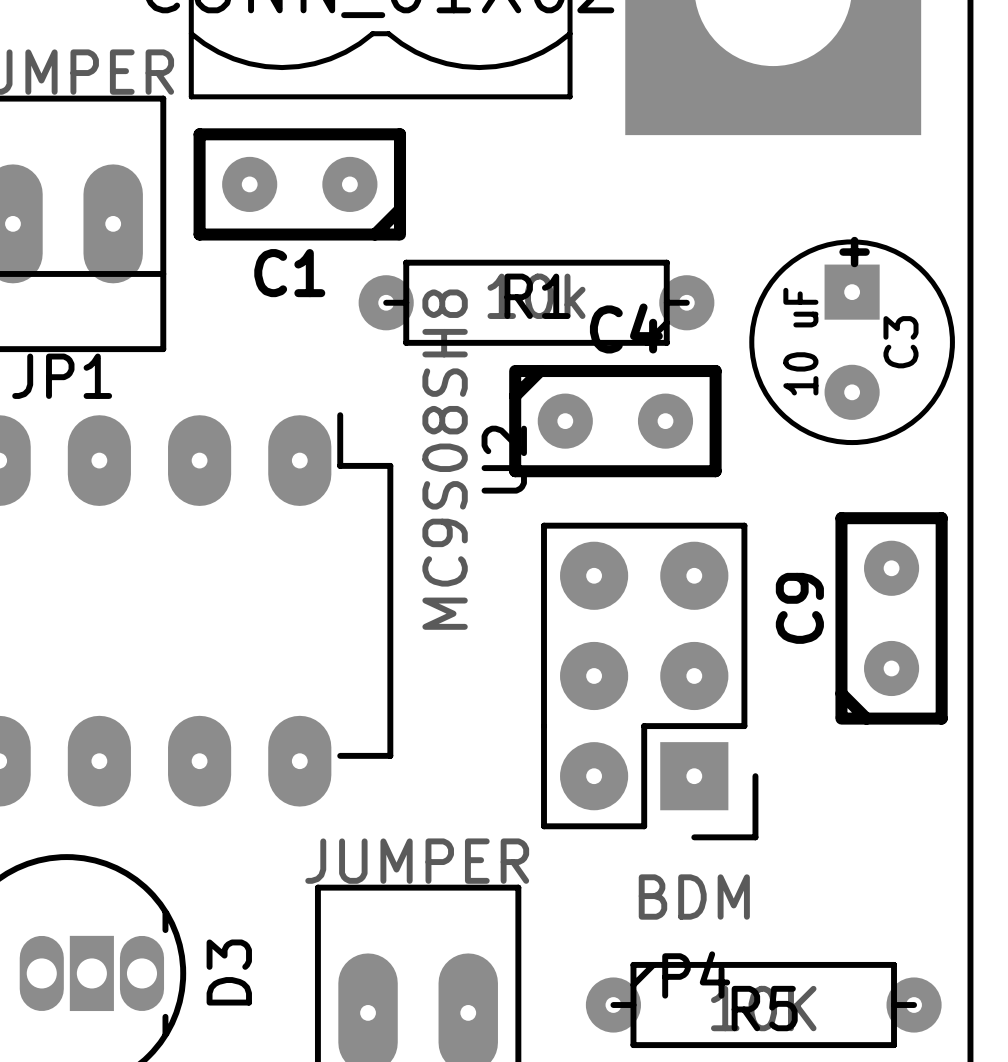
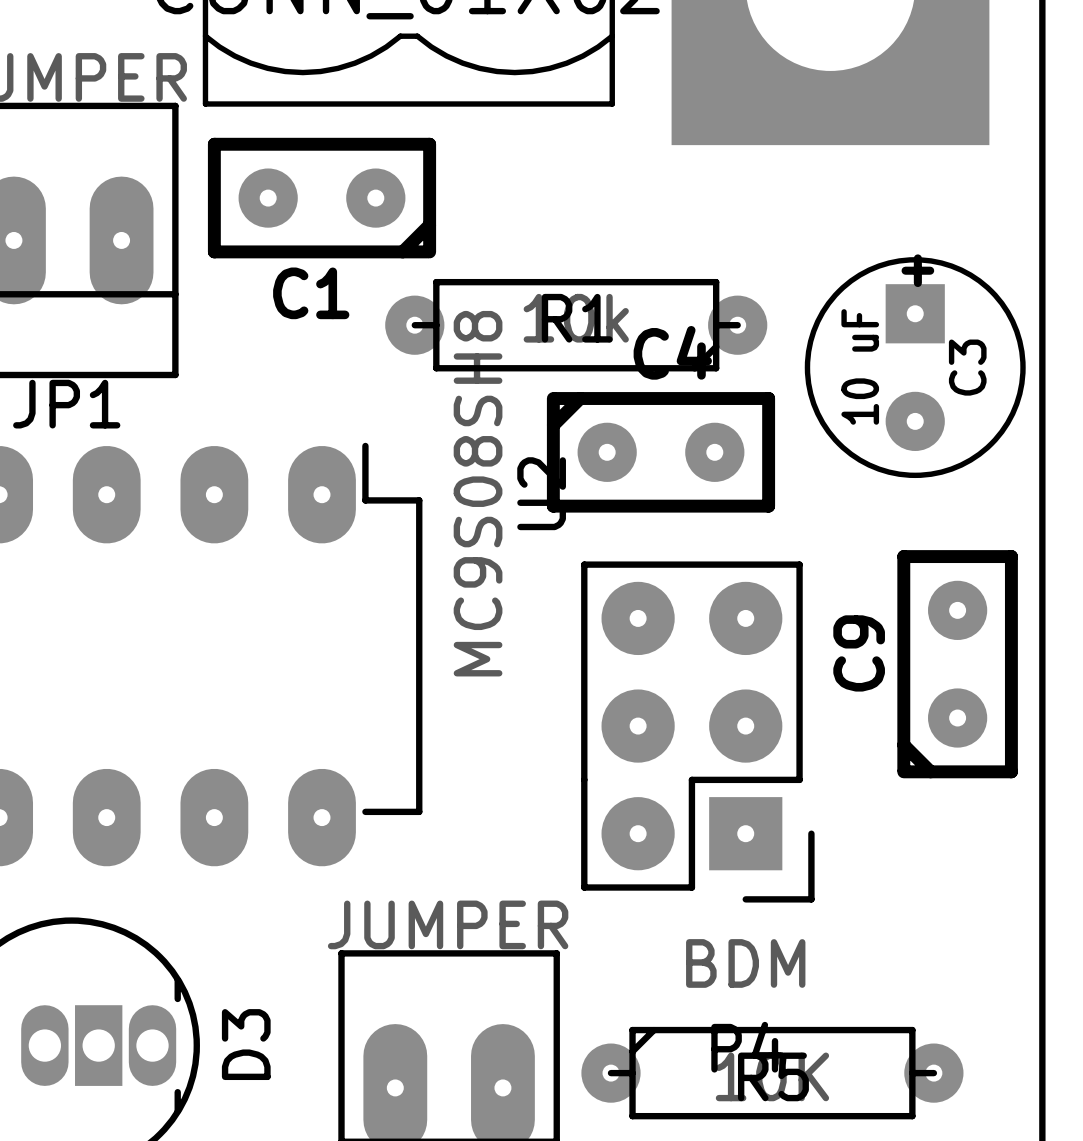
R5 position: (763, 1005) -> (772, 1073)

